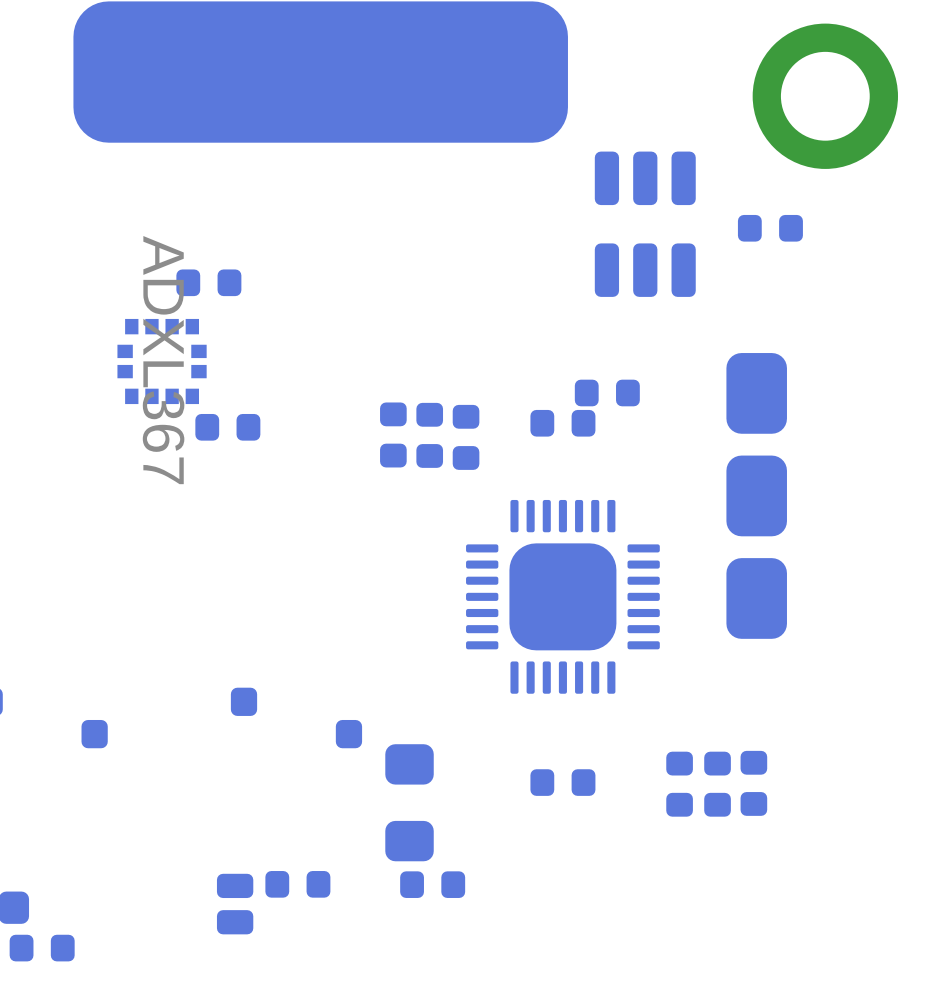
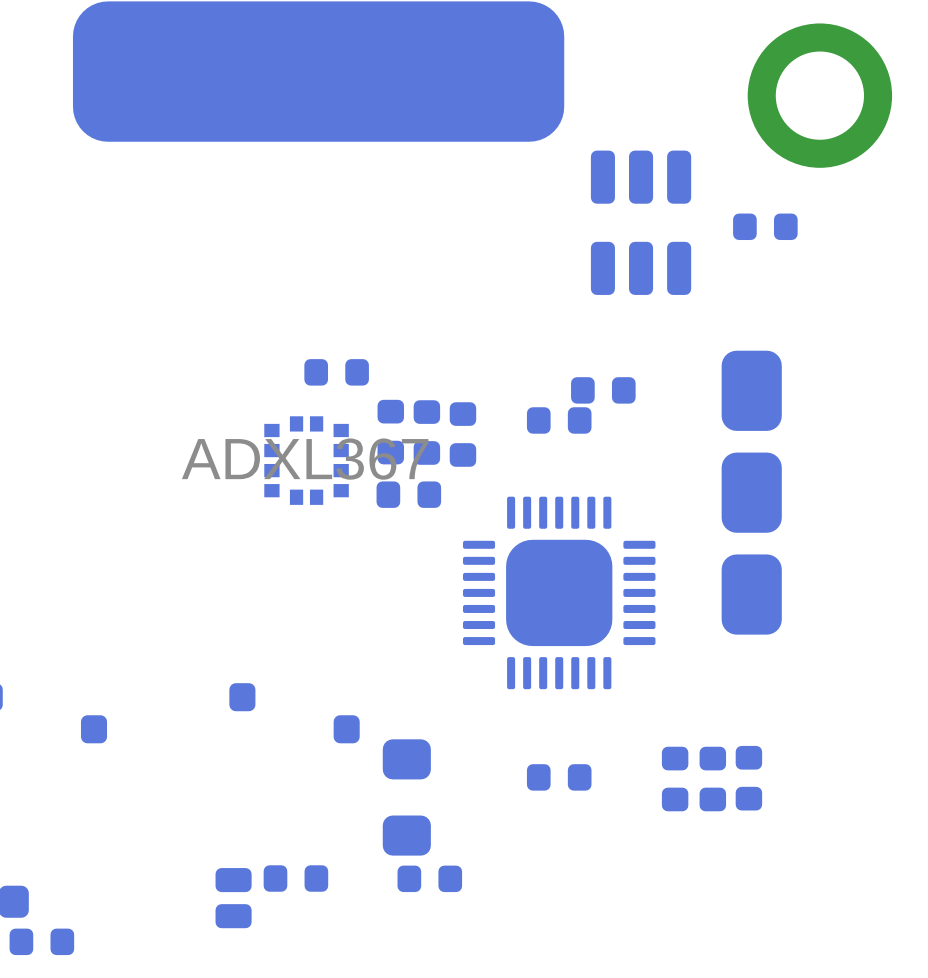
part: (208, 282) -> none
part rotation: 0° (162, 361) -> 90° clockwise (306, 460)
part position: (162, 361) -> (306, 460)
part: none -> (336, 372)
part: (227, 427) -> none
part: none -> (408, 494)

